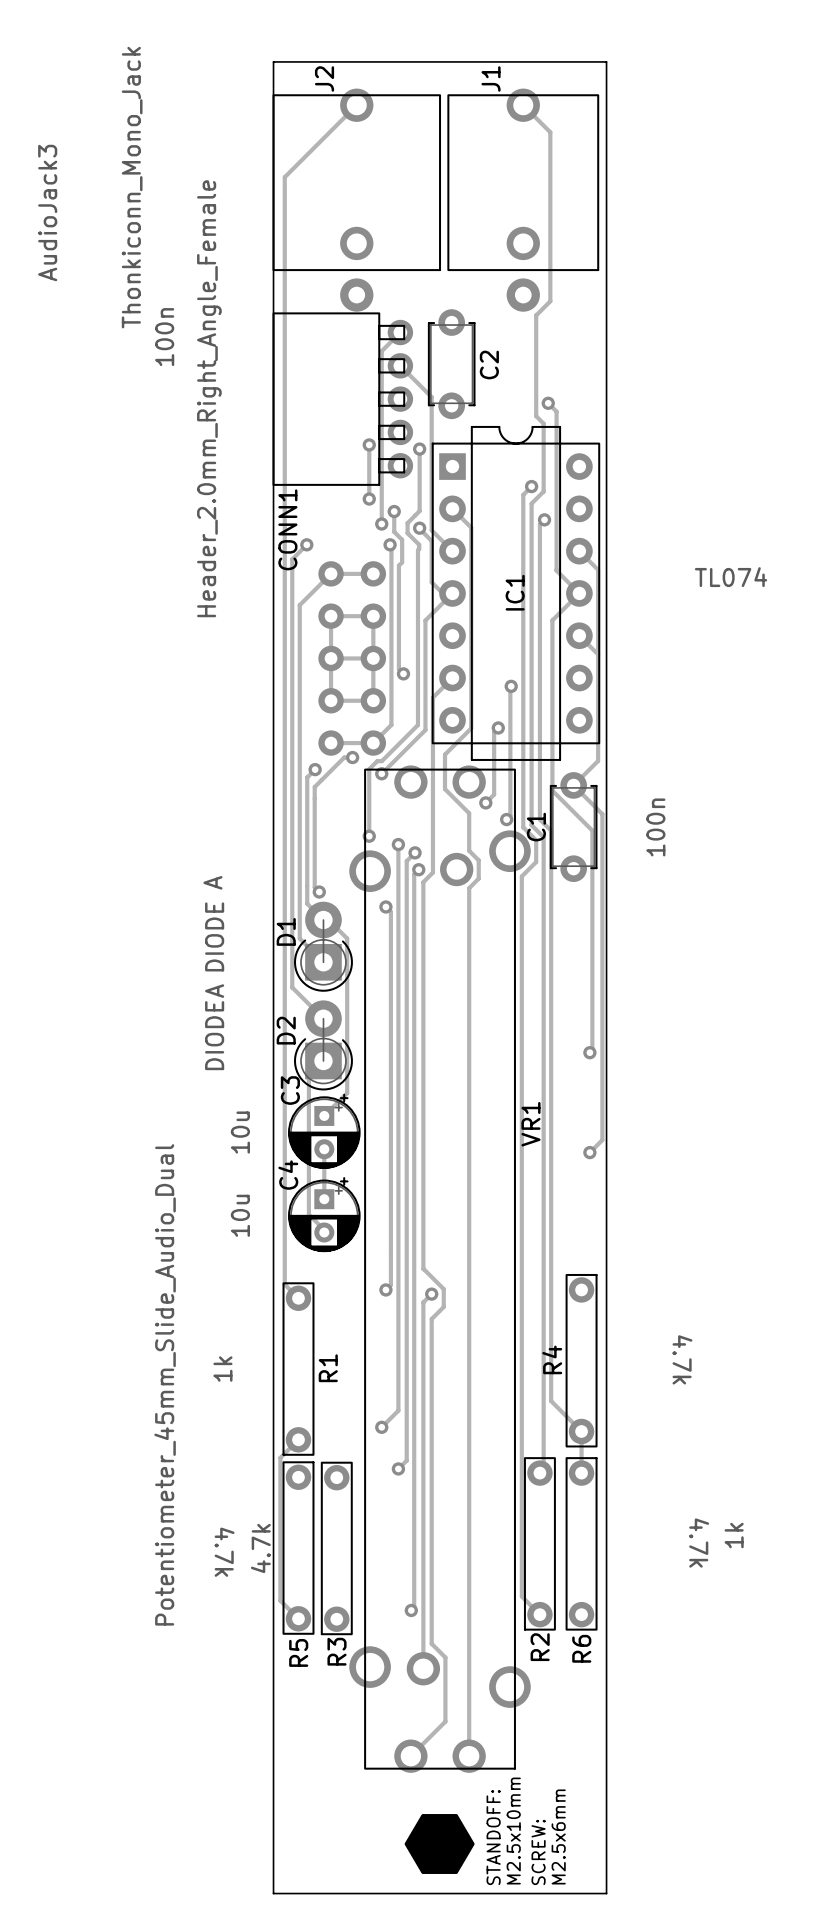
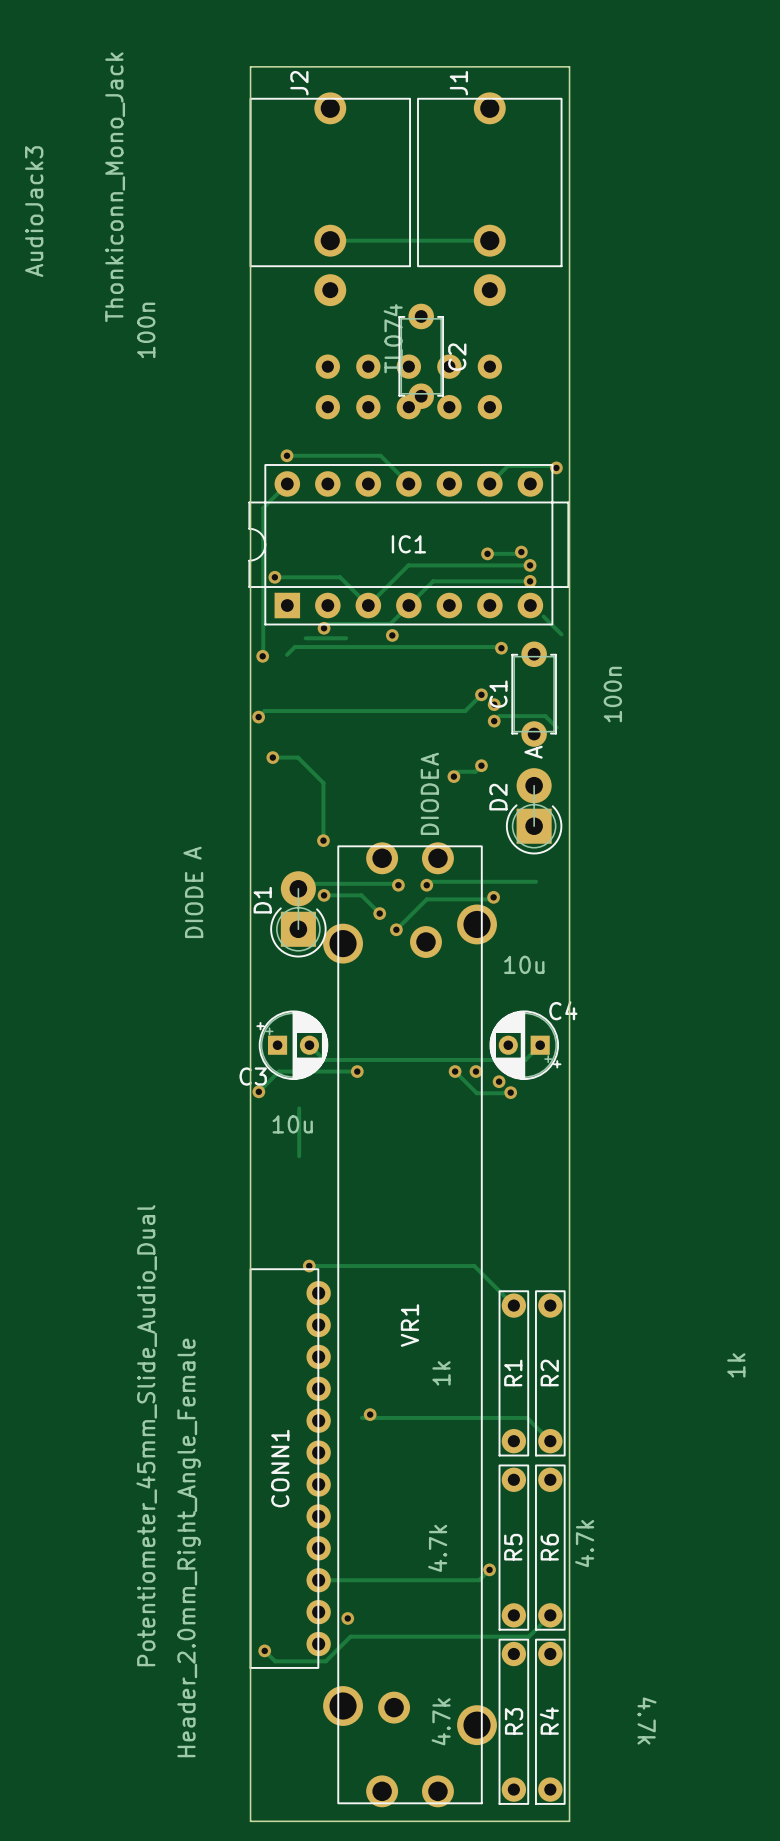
track: (356, 105) (284, 177) (284, 1284) (298, 1298) -> none
track: (523, 105) (550, 132) (550, 301) (536, 315) (536, 416) (543, 423) (543, 491) (531, 503) (531, 825) (543, 837) (543, 1469) (539, 1473) -> none
track: none -> (330, 240) (489, 240)
CONN1 footprint: [272, 312, 414, 486] -> [249, 1268, 331, 1669]
track: (400, 332) (381, 351) (381, 524) -> none
track: (400, 365) (431, 397) (431, 530) (452, 551) -> none
CONN1 value position: Header_2.0mm_Right_Angle_Female (209, 398) -> Header_2.0mm_Right_Angle_Female (189, 1547)
track: (548, 403) (556, 411) (556, 570) (579, 593) (552, 620) (552, 790) (592, 830) (592, 1050) (589, 1052) -> none
via: (548, 403) -> none
track: (369, 444) (369, 499) -> none
via: (369, 444) -> none
track: (419, 449) (419, 511) (407, 523) (407, 533) (419, 544) (417, 725) (381, 761) (377, 761) (369, 769) (369, 836) -> none
via: (419, 449) -> none
track: none -> (287, 455) (380, 455) (408, 483)
via: none -> (287, 455)
track: none -> (556, 467) (554, 466) (507, 466) (489, 483)
via: none -> (556, 467)
track: (531, 486) (523, 494) (523, 827) (536, 840) (536, 862) (521, 876) (521, 1596) (539, 1614) -> none
via: (531, 486) -> none
track: none -> (287, 483) (263, 508) (262, 656)
via: (369, 499) -> none
track: (452, 508) (471, 527) (471, 728) (445, 754) (445, 789) (469, 813) (469, 850) (478, 860) (478, 878) (469, 888) (469, 1756) -> none
track: (394, 511) (394, 531) (402, 539) (402, 562) (398, 565) (398, 669) (403, 673) -> none
via: (394, 511) -> none
track: (544, 519) (539, 524) (539, 819) (551, 830) (551, 1401) (581, 1431) (581, 1473) -> none
via: (544, 519) -> none
via: (381, 524) -> none
track: (419, 528) (431, 540) (431, 582) (442, 593) (452, 593) (425, 620) (425, 730) (381, 773) -> none
via: (419, 528) -> none
CONN1 name position: CONN1 (287, 529) -> CONN1 (280, 1468)
track: (306, 544) (292, 559) (292, 987) (323, 1018) -> none
via: (306, 544) -> none
track: (390, 544) (391, 724) (373, 743) (331, 743) -> none
via: (390, 544) -> none
track: (579, 551) (598, 569) (598, 760) (573, 785) (602, 814) (602, 1140) (589, 1152) -> none
track: none -> (521, 552) (519, 553) (487, 553)
via: none -> (521, 552)
via: none -> (487, 553)
track: (373, 573) (331, 573) (299, 605) (299, 938) (323, 962) -> none
track: none -> (530, 565) (408, 565) (368, 605) (340, 577) (274, 577)
via: none -> (530, 565)
IC1 rotation: 0° (515, 593) -> 90° counterclockwise (408, 544)
via: none -> (274, 577)
track: none -> (530, 581) (433, 581) (390, 623) (328, 623) (324, 628)
via: none -> (530, 581)
track: (331, 616) (331, 700) (373, 700) (373, 616) (331, 616) -> none
via: none -> (324, 628)
part rotation: 0° (352, 658) -> 90° clockwise (408, 386)
part position: (352, 658) -> (408, 386)
track: none -> (501, 648) (294, 647) (287, 654)
via: none -> (501, 648)
via position: (403, 673) -> (392, 635)
via: none -> (262, 656)
track: (452, 678) (432, 697) (432, 872) (423, 882) (423, 1269) (443, 1289) (443, 1307) (431, 1319) (431, 1643) (445, 1657) (445, 1721) (410, 1756) -> none
track: (511, 686) (510, 815) (506, 819) -> none
via: (511, 686) -> none
track: none -> (481, 694) (465, 711) (264, 711) (258, 717)
via: none -> (481, 694)
track: (498, 727) (494, 732) (494, 794) (485, 802) -> none
via: (498, 727) -> none
via: none -> (494, 704)
via: none -> (258, 717)
track: none -> (494, 721) (499, 716) (545, 716) (556, 727)
via: none -> (494, 721)
track: (352, 757) (344, 757) (314, 787) (314, 887) (319, 892) -> none
via: (352, 757) -> none
track: (315, 769) (307, 777) (307, 903) (323, 920) (328, 920) (347, 938) (347, 1093) (324, 1115) -> none
via: (315, 769) -> none
via: (381, 773) -> none
D2 text: none -> A (533, 752)
track: none -> (272, 757) (298, 757) (323, 783) (323, 840)
via: none -> (272, 757)
track: none -> (481, 765) (475, 771) (457, 771)
via position: (506, 819) -> (481, 765)
C1 position: (573, 827) -> (534, 694)
via: (369, 836) -> none
track: (398, 844) (398, 1410) (381, 1427) -> none
via: (398, 844) -> none
track: (415, 852) (406, 861) (406, 1460) (398, 1468) -> none
via: (415, 852) -> none
via: none -> (323, 840)
track: (418, 869) (414, 874) (414, 1607) (411, 1610) -> none
via: (418, 869) -> none
via: (319, 892) -> none
track: (385, 906) (390, 911) (390, 1284) (385, 1289) -> none
via: (385, 906) -> none
track: none -> (536, 881) (430, 881) (426, 885)
track: none -> (287, 883) (398, 885)
via: none -> (398, 885)
via: none -> (426, 885)
track: none -> (324, 895) (361, 895) (379, 913)
via: none -> (324, 895)
track: none -> (493, 897) (491, 899) (426, 899) (396, 929)
via: none -> (493, 897)
via: none -> (379, 913)
via: none -> (396, 929)
D2 position: (323, 1045) -> (534, 811)
via: (589, 1052) -> none
track: (323, 1061) (308, 1075) (308, 1214) (324, 1229) -> none
track: none -> (309, 1045) (324, 1059) (525, 1059) (540, 1045)
track: none -> (357, 1071) (279, 1071) (258, 1091)
via: none -> (357, 1071)
track: none -> (455, 1071) (476, 1093) (510, 1092)
via: none -> (455, 1071)
via: none -> (475, 1071)
via: none -> (499, 1081)
VR1 name position: VR1 (530, 1124) -> VR1 (409, 1325)
via: none -> (258, 1091)
C3 rotation: 0° (324, 1131) -> 90° counterclockwise (292, 1045)
C3 position: (324, 1131) -> (292, 1045)
via: none -> (510, 1092)
via: (589, 1152) -> none
C4 rotation: 0° (324, 1214) -> 90° clockwise (525, 1045)
C4 position: (324, 1214) -> (525, 1045)
VR1 position: (440, 1269) -> (410, 1324)
via: (385, 1289) -> none
track: (431, 1294) (423, 1302) (423, 1668) -> none
via: (431, 1294) -> none
track: none -> (309, 1266) (474, 1266) (513, 1305)
via: none -> (309, 1266)
R4 name position: R4 (552, 1359) -> R4 (549, 1721)
R4 position: (581, 1360) -> (550, 1721)
R1 name position: R1 (328, 1368) -> R1 (513, 1373)
R1 position: (298, 1369) -> (513, 1373)
via: (381, 1427) -> none
track: (298, 1439) (280, 1457) (280, 1600) (298, 1618) -> none
track: none -> (361, 1417) (527, 1417) (550, 1441)
R2 position: (539, 1543) -> (550, 1373)
R6 position: (581, 1543) -> (550, 1547)
R6 value rotation: 0° (699, 1543) -> 180° (437, 1548)
R6 value position: 4.7k (699, 1543) -> 4.7k (437, 1548)
R5 position: (298, 1548) -> (513, 1547)
R3 position: (336, 1548) -> (513, 1721)
R5 value rotation: 0° (224, 1552) -> 180° (584, 1543)
R5 value position: 4.7k (224, 1552) -> 4.7k (584, 1543)
via: (411, 1610) -> none
track: none -> (489, 1569) (479, 1580) (318, 1580)
via: none -> (489, 1569)
R2 name position: R2 (540, 1647) -> R2 (549, 1373)
R6 name position: R6 (581, 1648) -> R6 (549, 1547)
R3 name position: R3 (337, 1651) -> R3 (514, 1721)
R5 name position: R5 (298, 1652) -> R5 (513, 1547)
track: none -> (550, 1615) (529, 1636) (350, 1636) (325, 1661) (275, 1661) (264, 1650)
via: none -> (347, 1618)
via: none -> (264, 1650)
drawing: [404, 1814, 475, 1874] -> none
text: M2.5x10mm (513, 1831) -> none
text: M2.5x6mm (558, 1836) -> none
text: STANDOFF: (493, 1837) -> none
text: SCREW: (538, 1852) -> none

